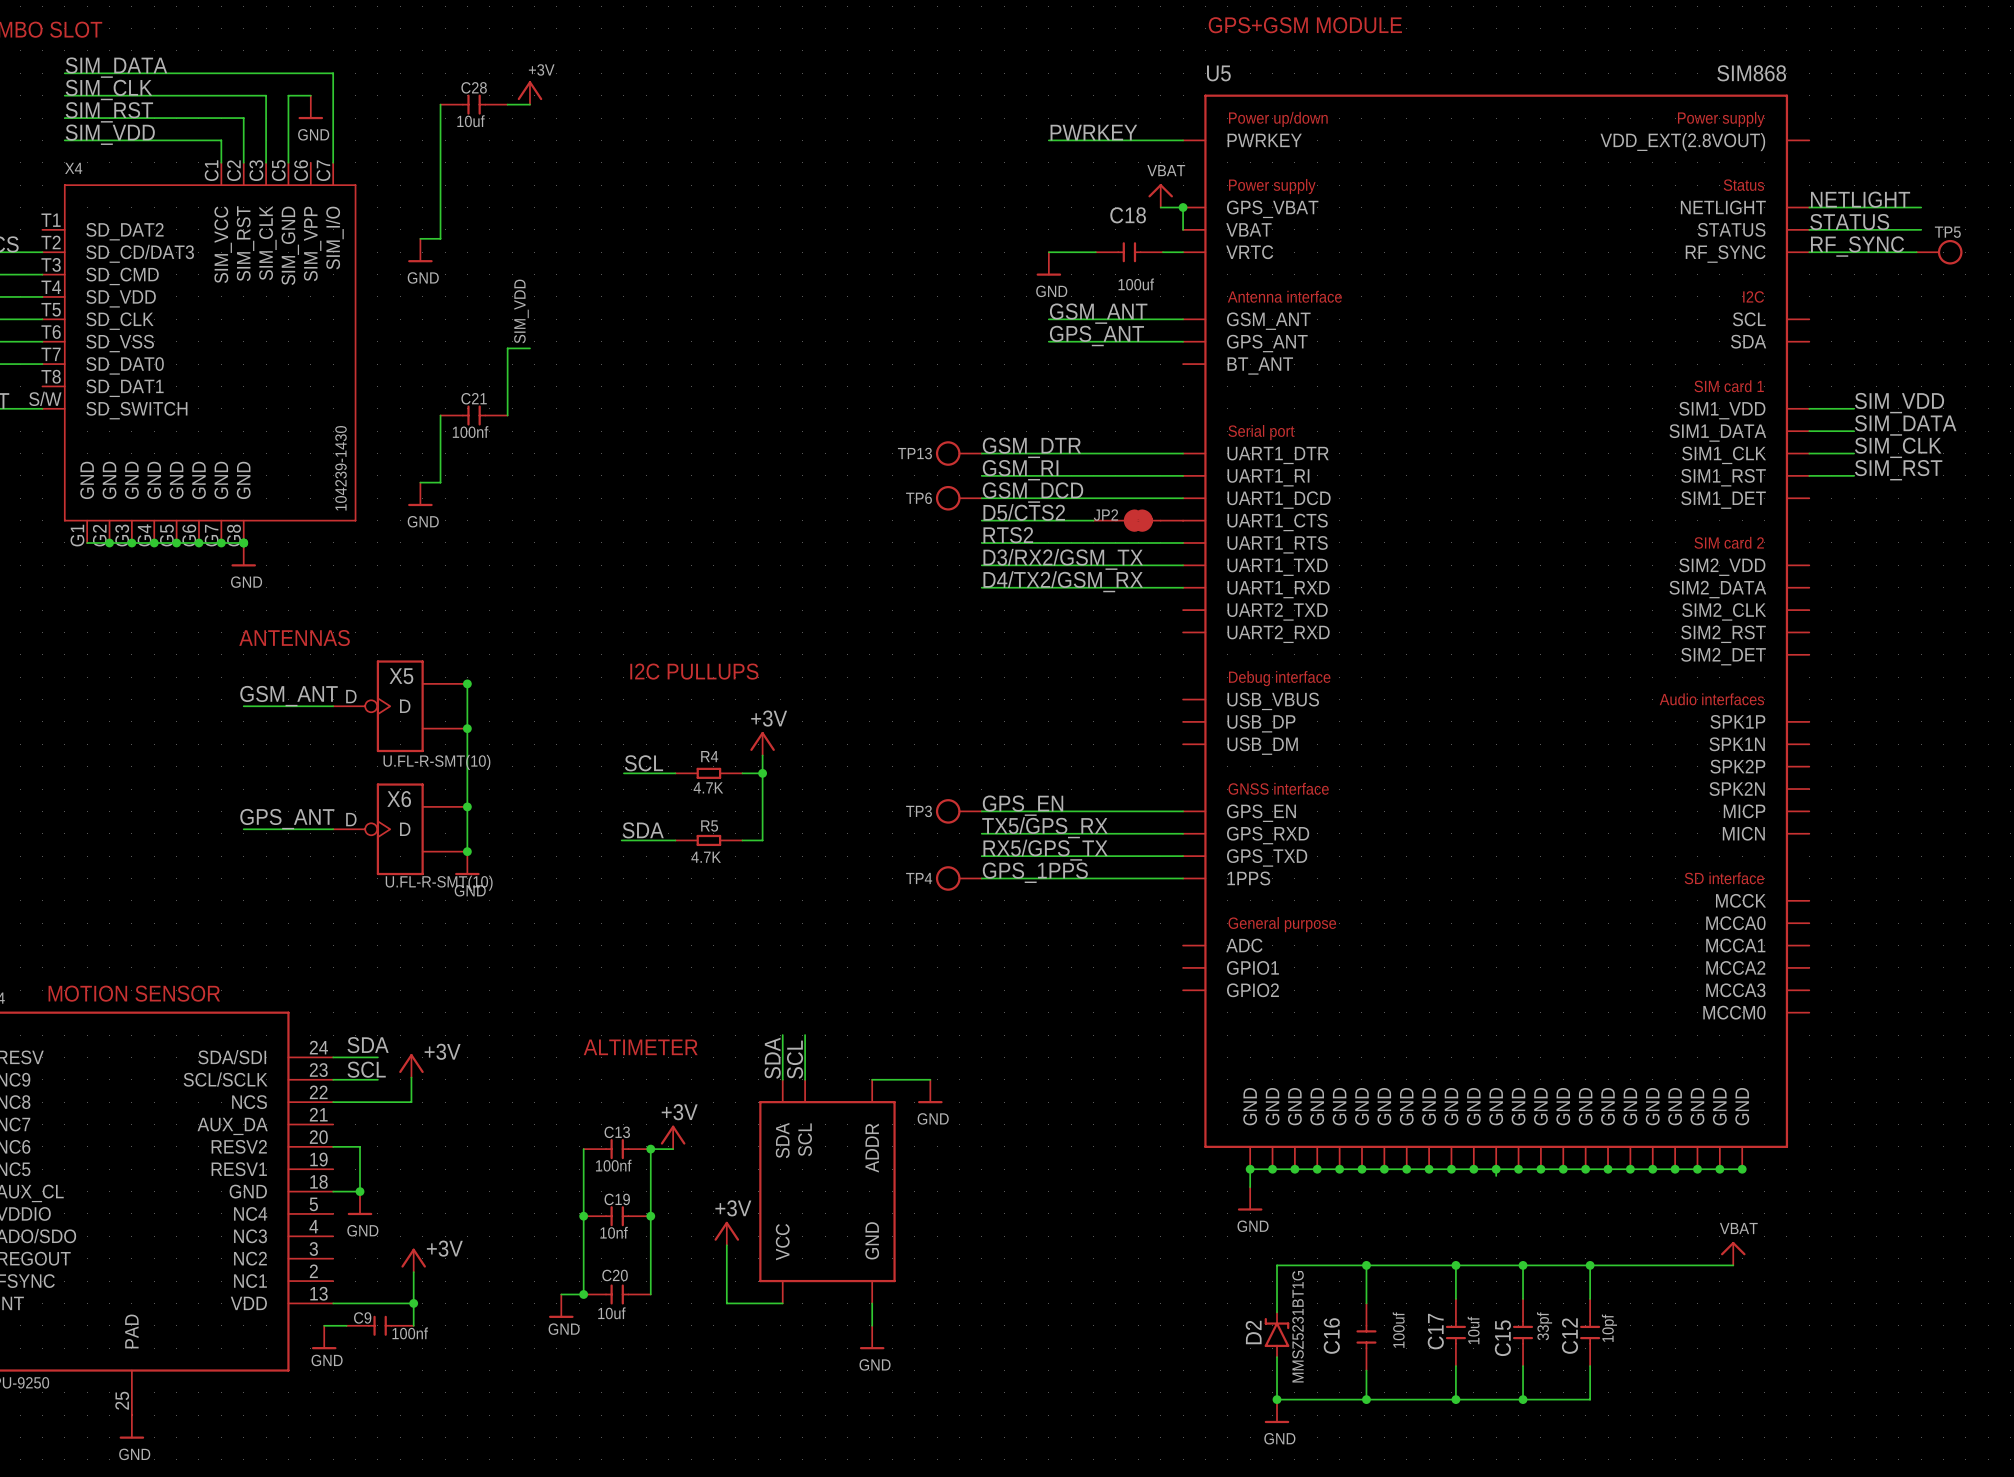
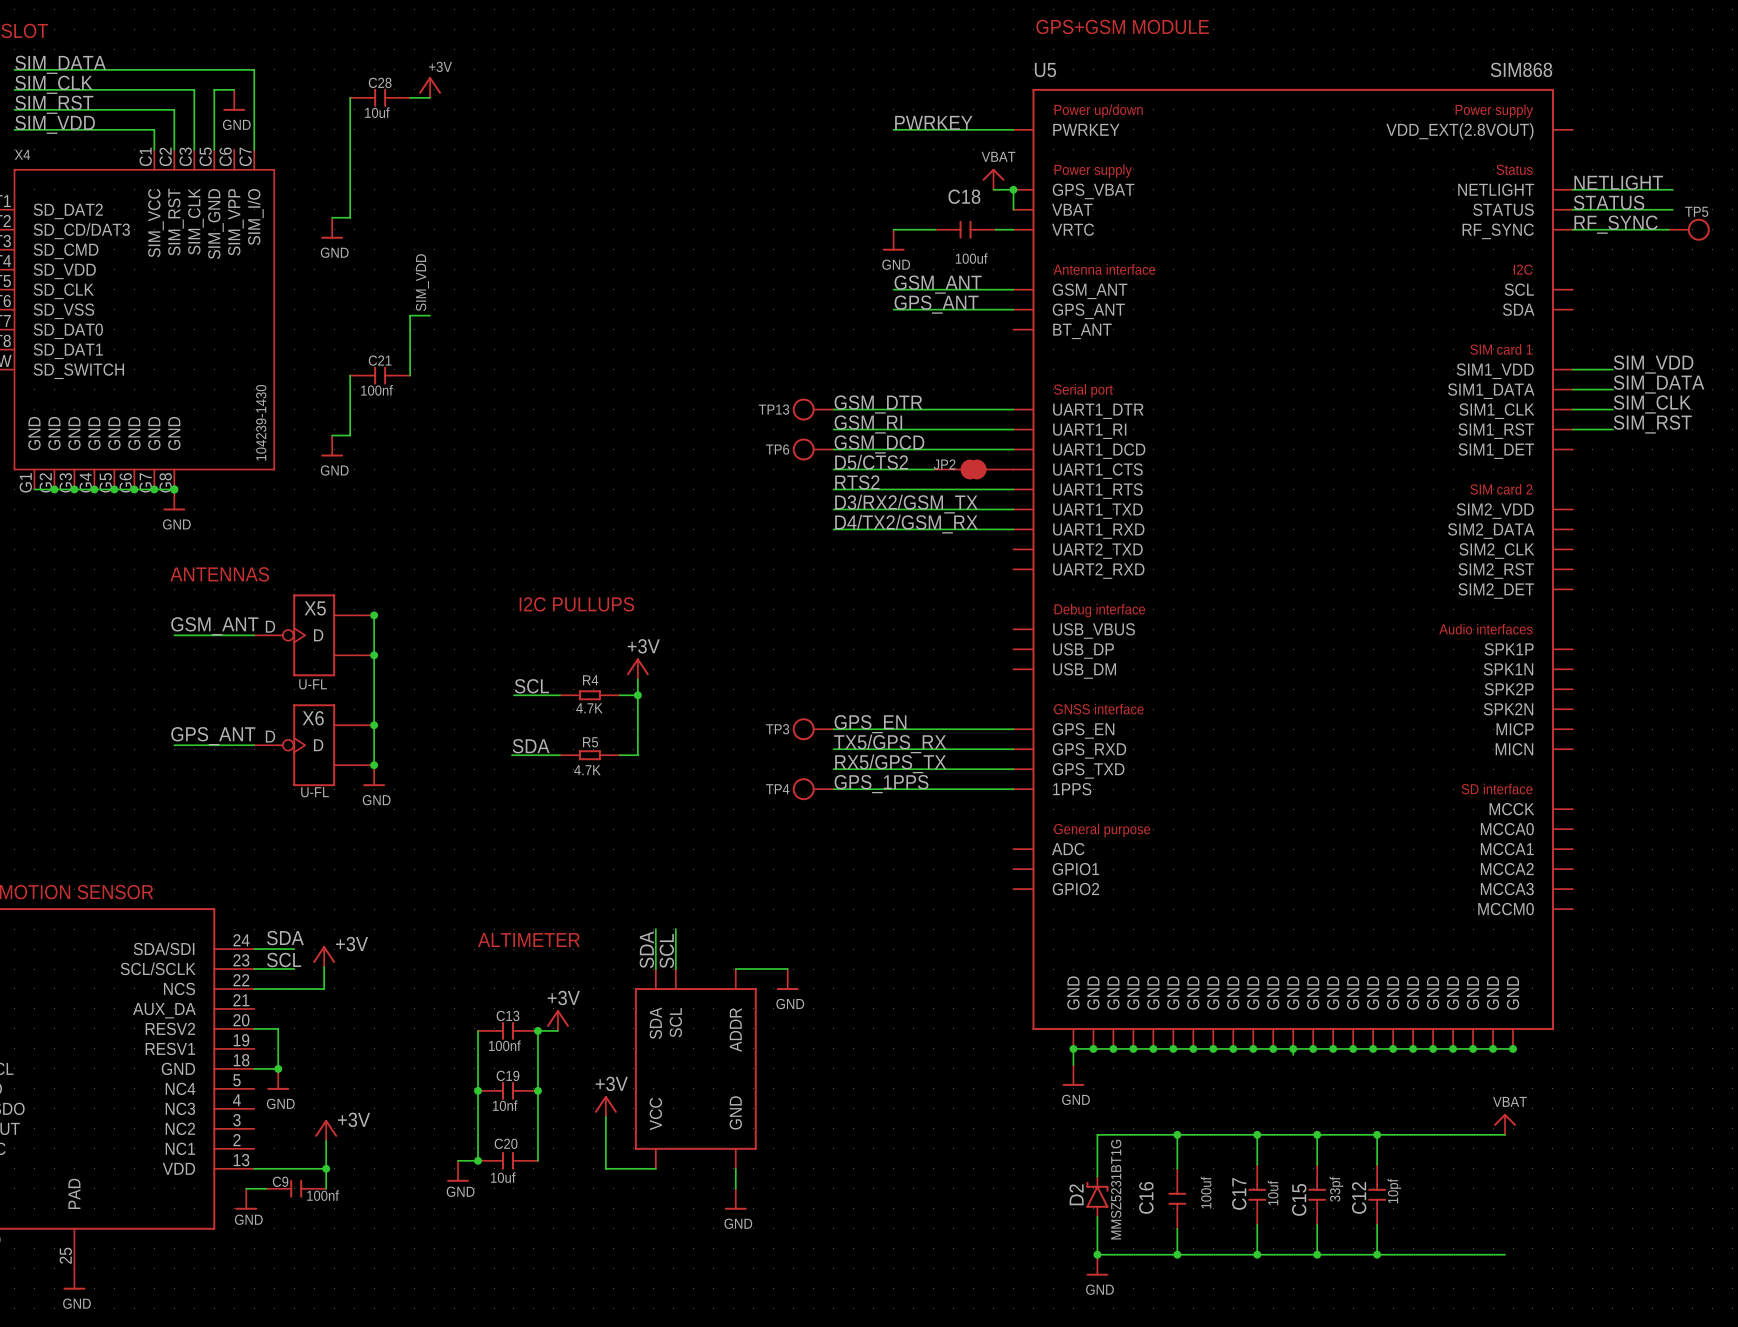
X5 value: U.FL-R-SMT(10) (436, 762) -> U-FL (313, 684)
X6 value: U.FL-R-SMT(10) (439, 883) -> U-FL (315, 792)
wire: none -> (1377, 1254) (1505, 1254)
junction: none -> (1377, 1254)

